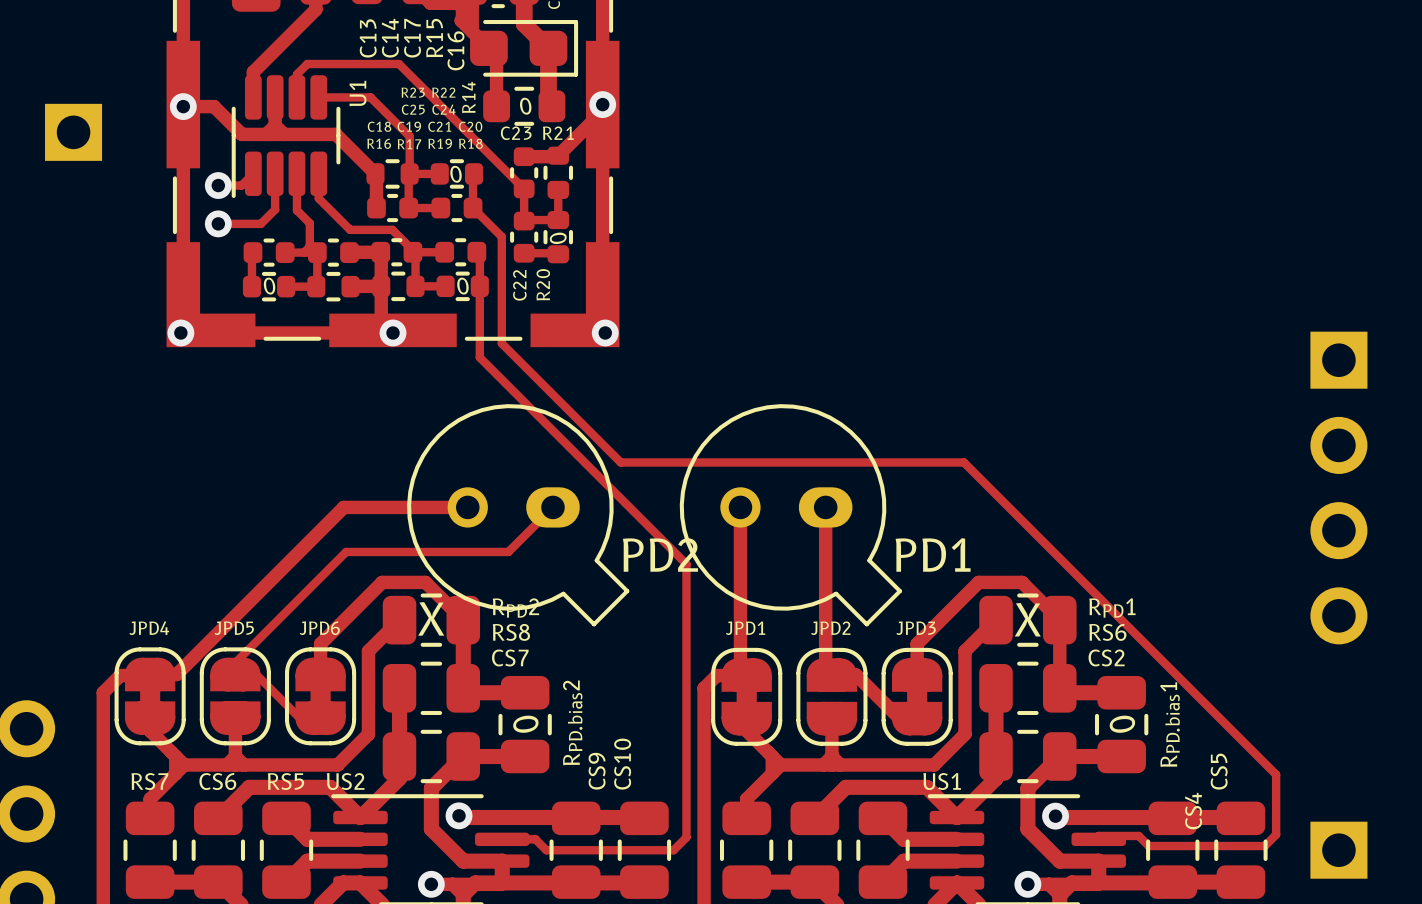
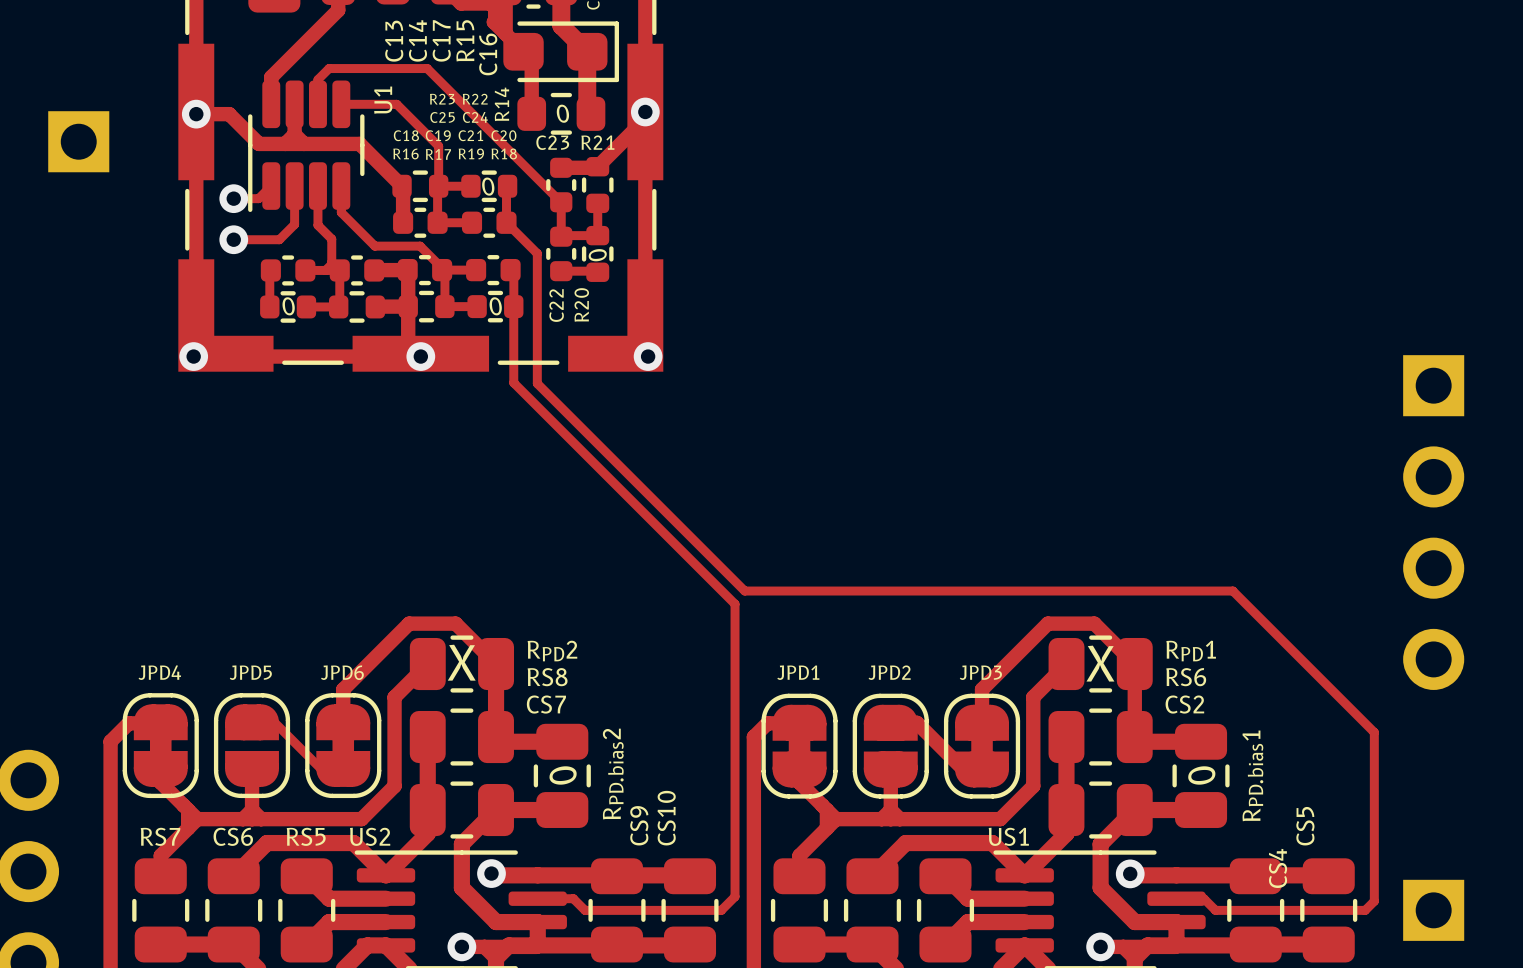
track: (501, 343) (620, 462) (963, 462) (1276, 774) (1276, 834) (1264, 846) (1148, 846) (1138, 835) (1098, 835) (1098, 839) -> (537, 367) (537, 383) (744, 591) (1232, 591) (1374, 732) (1374, 901) (1365, 910) (1215, 910) (1203, 898) (1176, 898)
track: (467, 507) (343, 507) (176, 674) (150, 674) -> none
track: (552, 507) (508, 551) (346, 551) (235, 662) (235, 674) -> none
track: (740, 507) (740, 668) (746, 675) -> none
track: (825, 507) (825, 668) (831, 675) -> none
PD2: (518, 515) -> none
PD1: (790, 515) -> none

